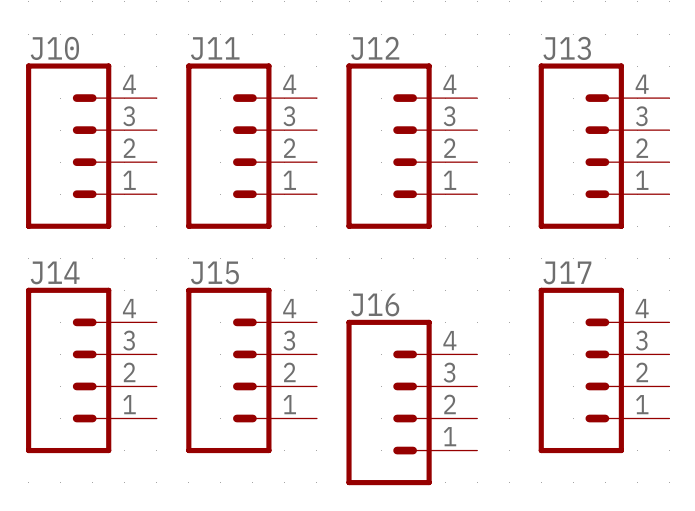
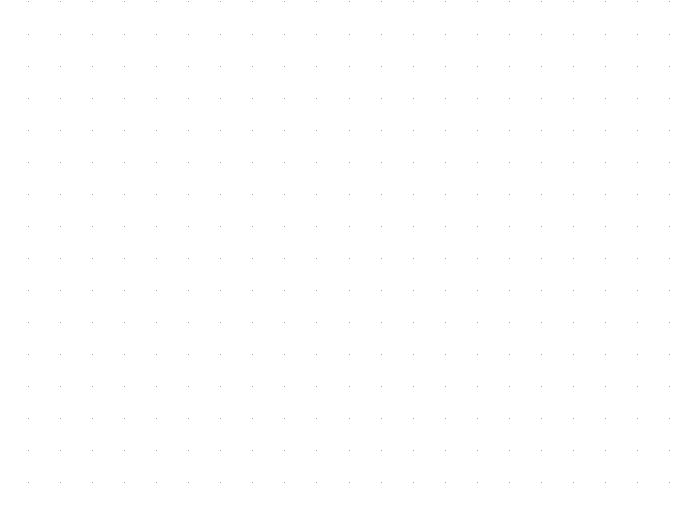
J10: (91, 146) -> none
J11: (251, 146) -> none
J12: (411, 146) -> none
J13: (604, 146) -> none
J14: (91, 370) -> none
J15: (251, 370) -> none
J17: (604, 370) -> none
J16: (411, 402) -> none

